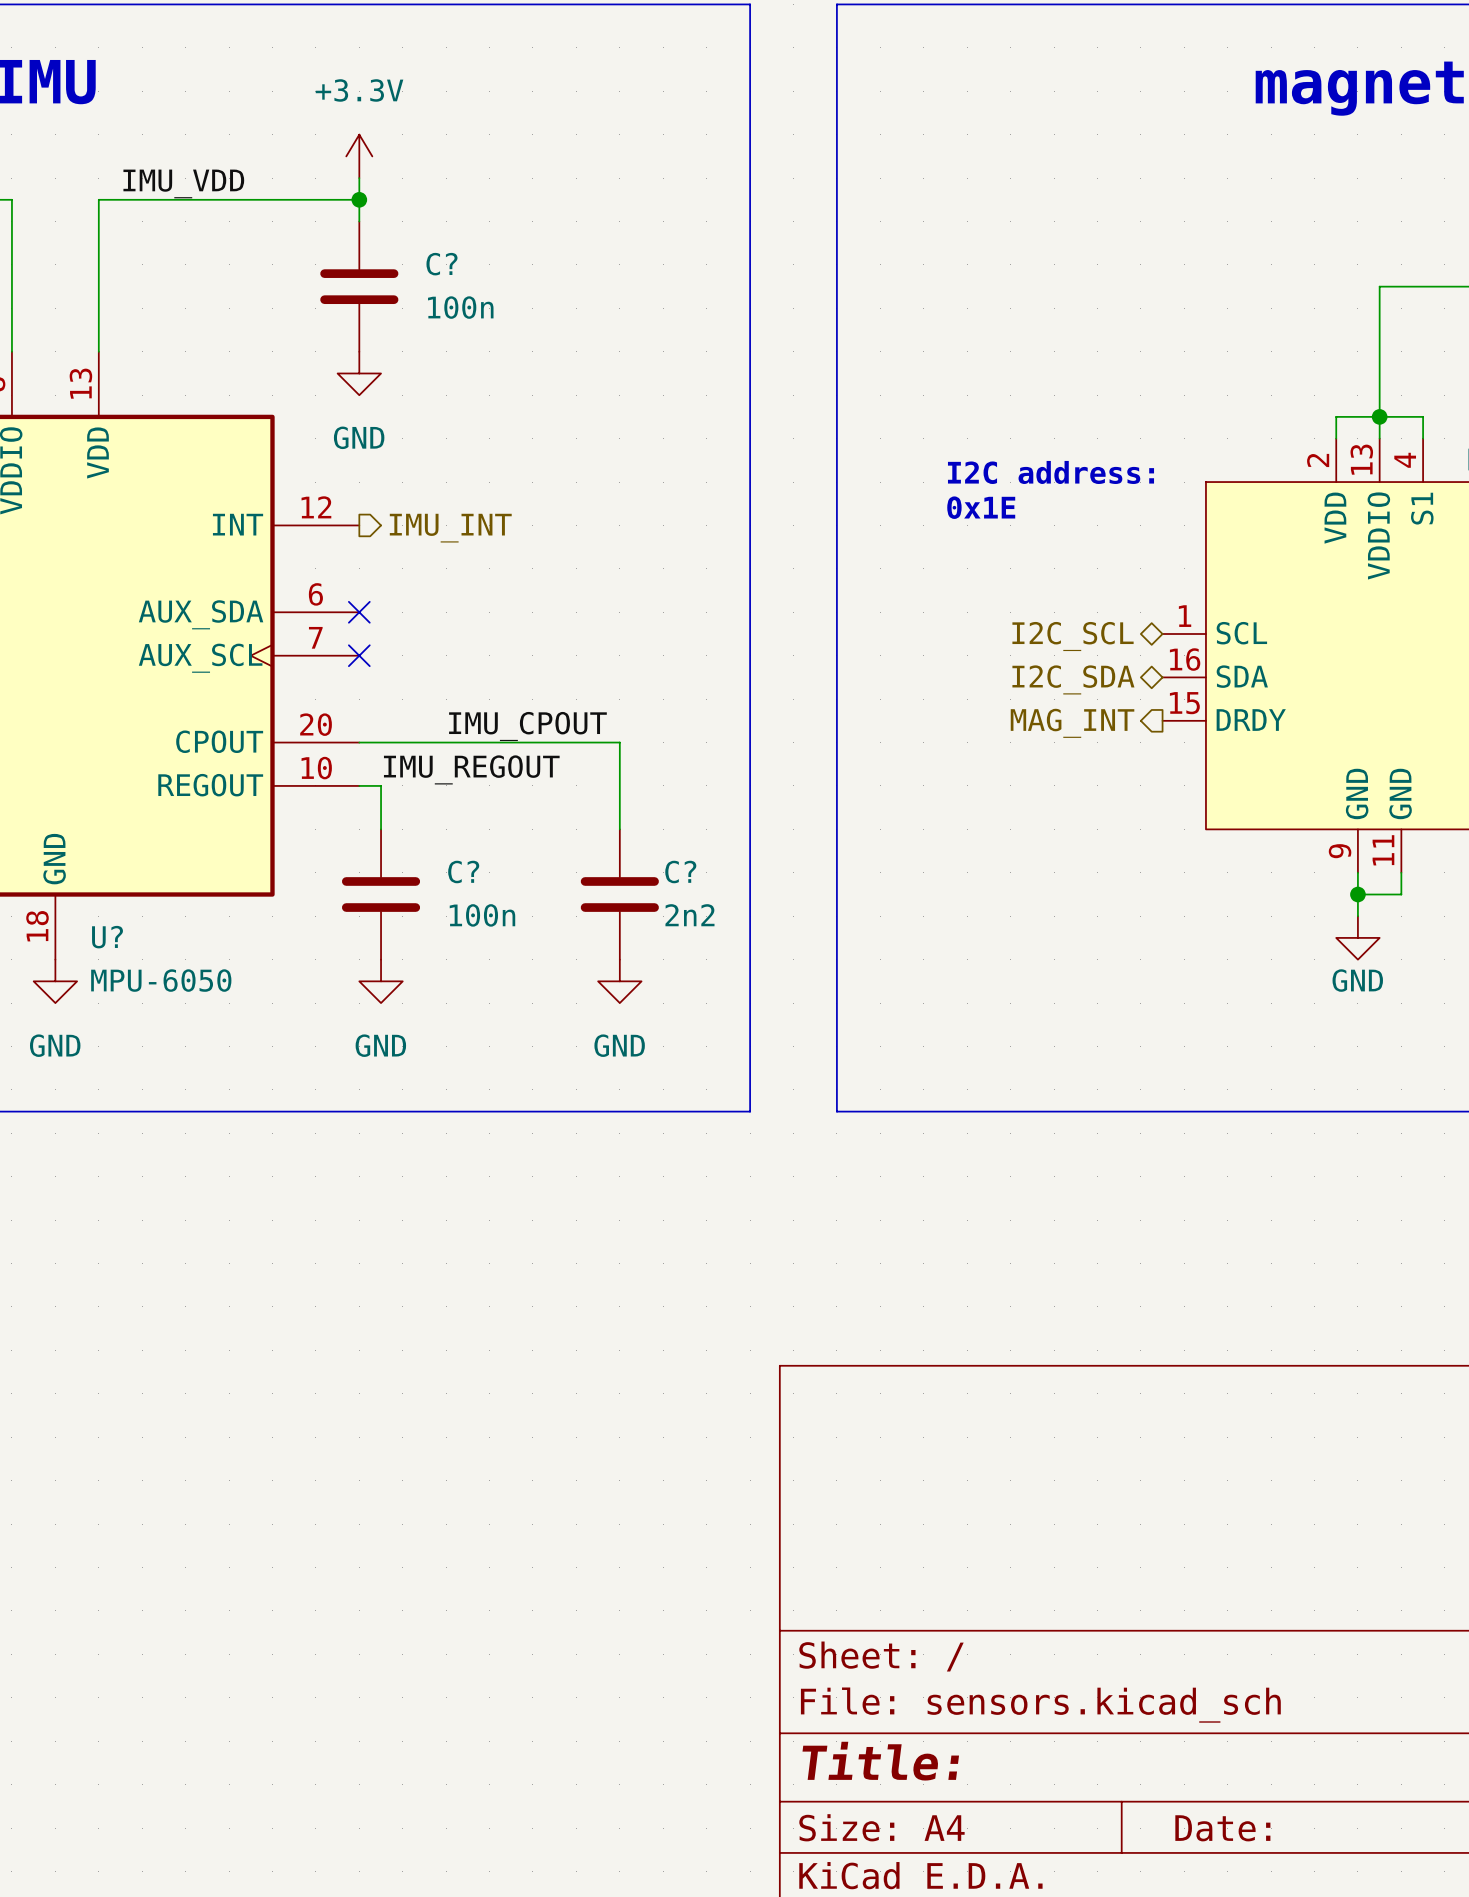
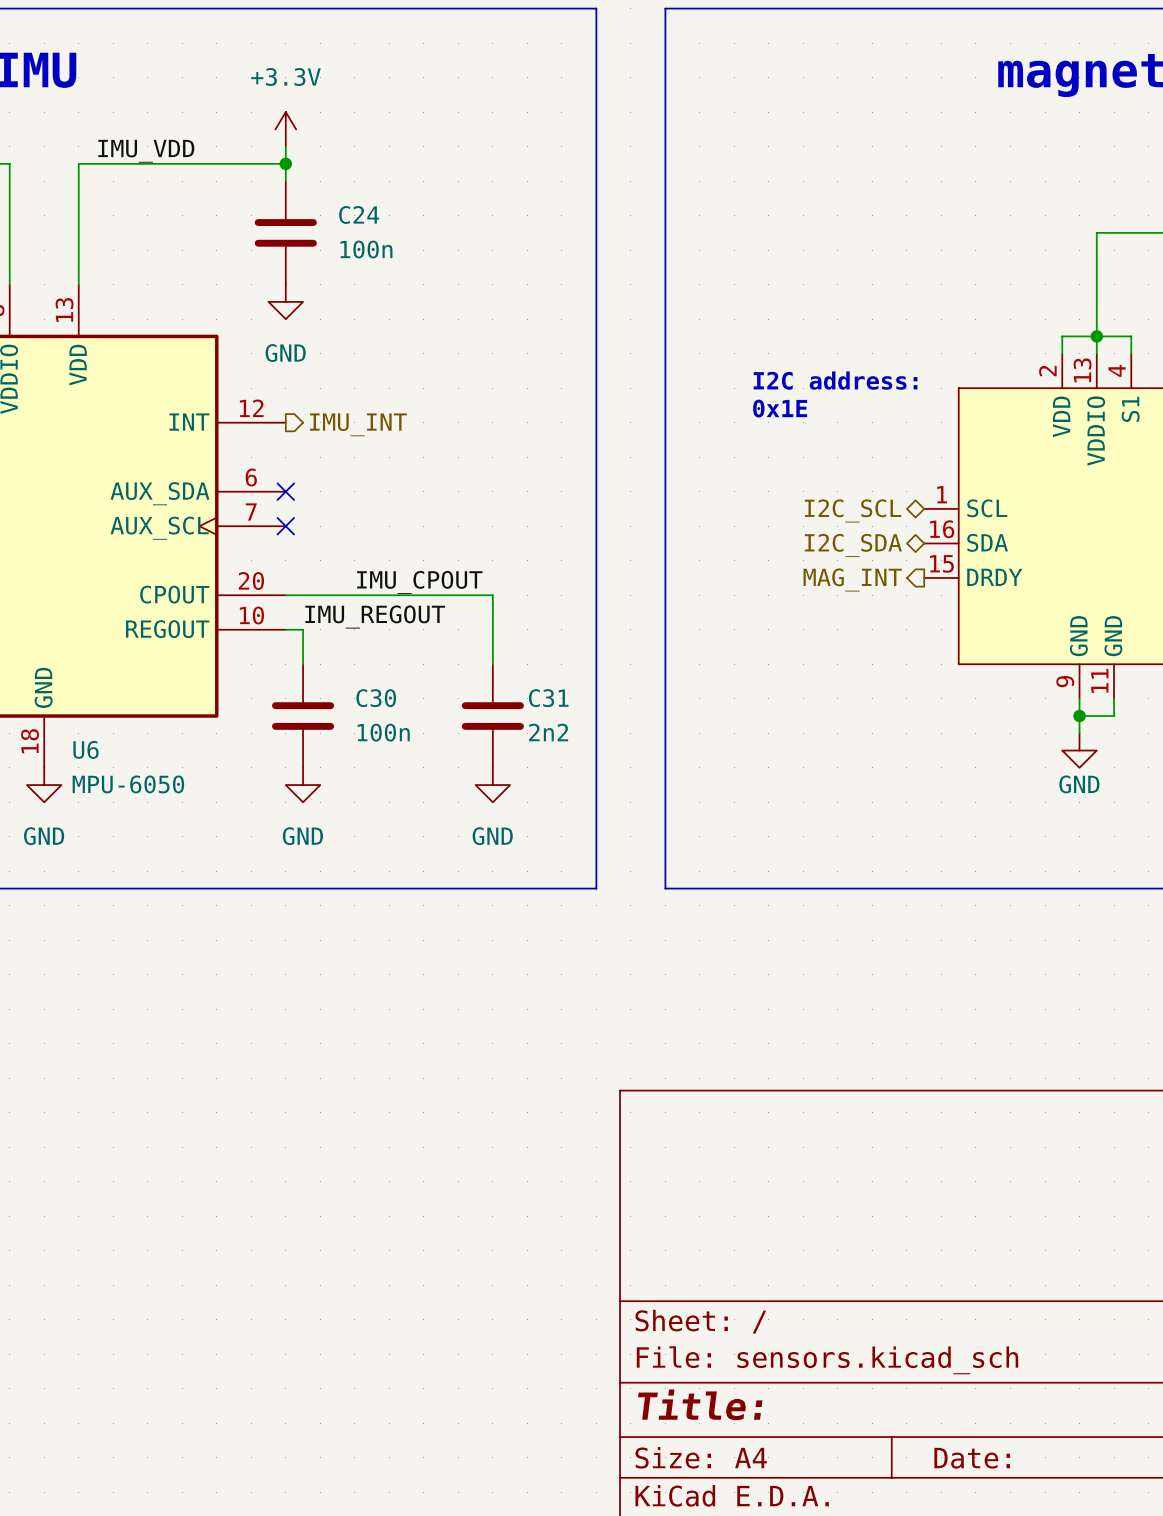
C? name: C? (441, 264) -> C24 (359, 215)
C? name: C? (463, 872) -> C30 (376, 698)
C? name: C? (680, 872) -> C31 (548, 698)
U? name: U? (107, 937) -> U6 (85, 749)

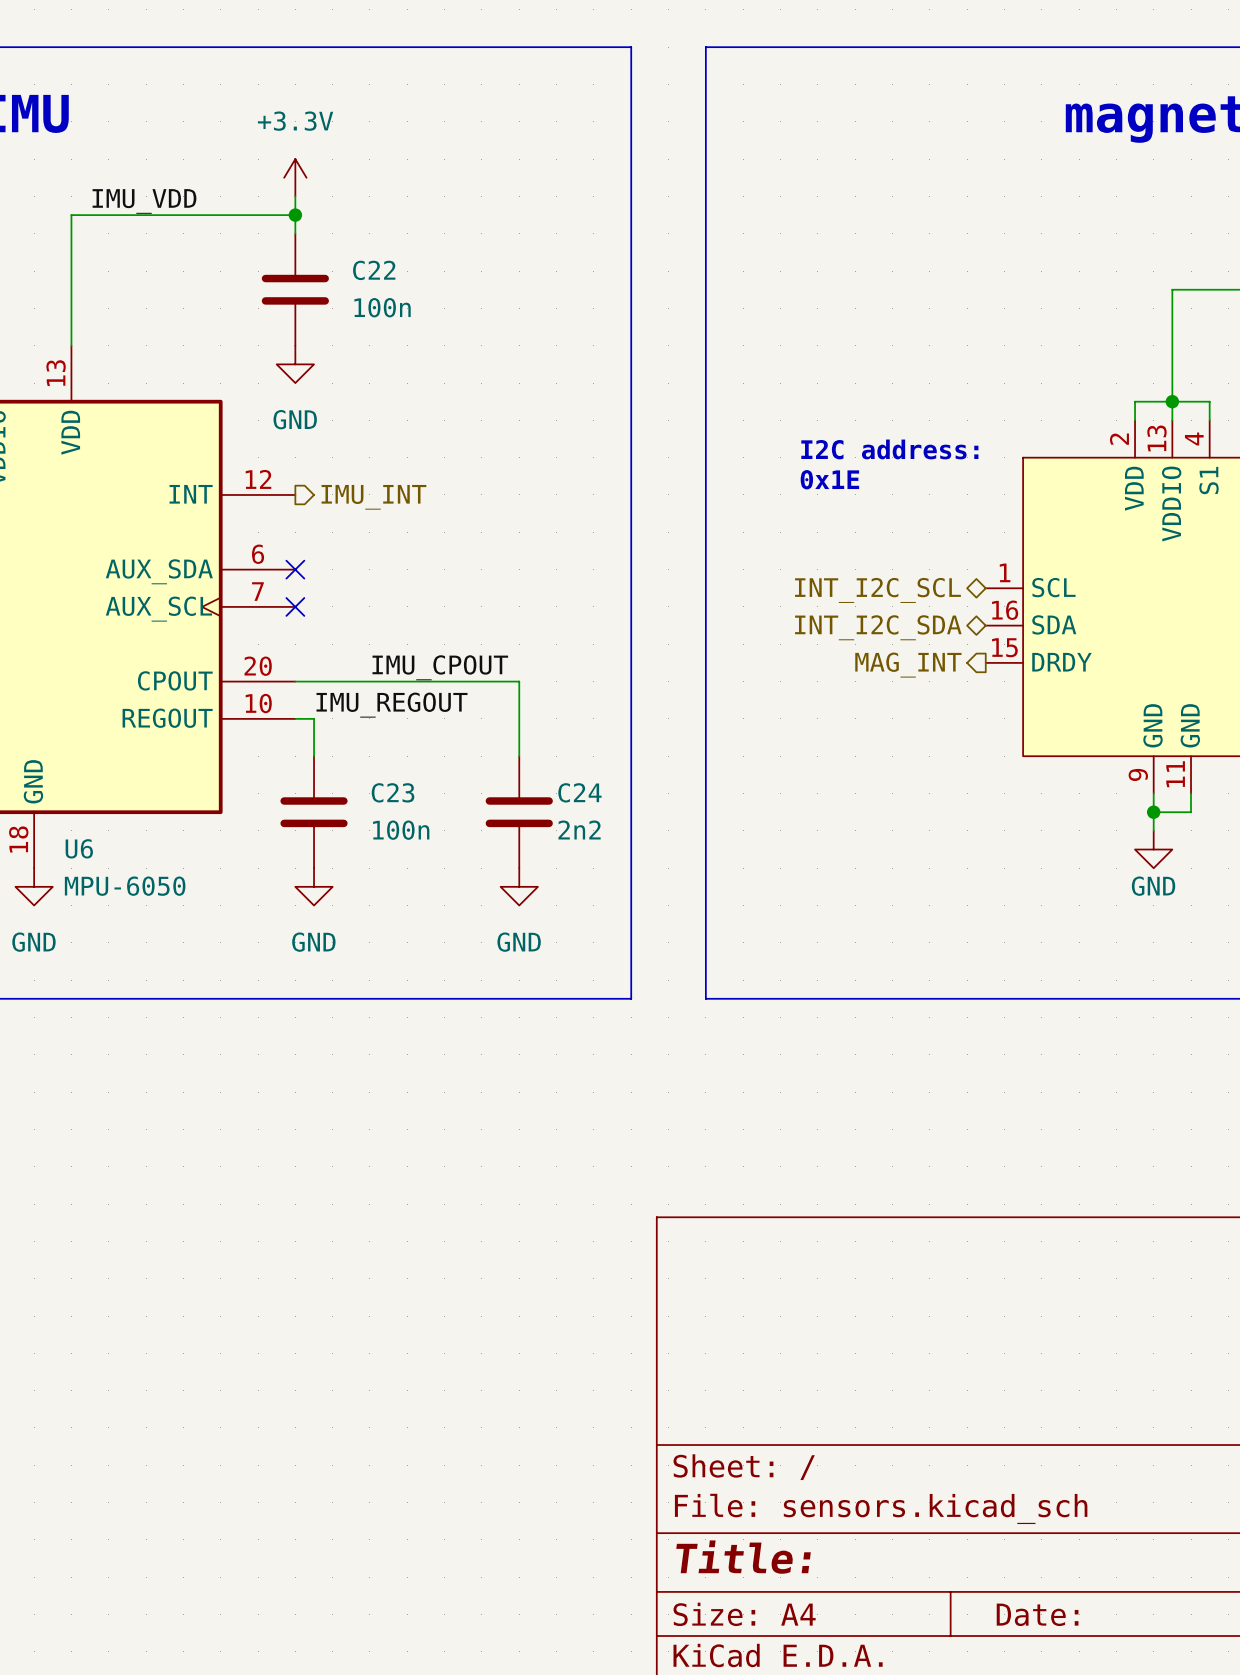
C24 name: C24 (359, 215) -> C22 (374, 270)
hierarchical label: I2C_SCL (853, 510) -> INT_I2C_SCL (877, 590)
hierarchical label: I2C_SDA (853, 545) -> INT_I2C_SDA (878, 627)
C30 name: C30 (376, 698) -> C23 (393, 792)
C31 name: C31 (548, 698) -> C24 (579, 792)

